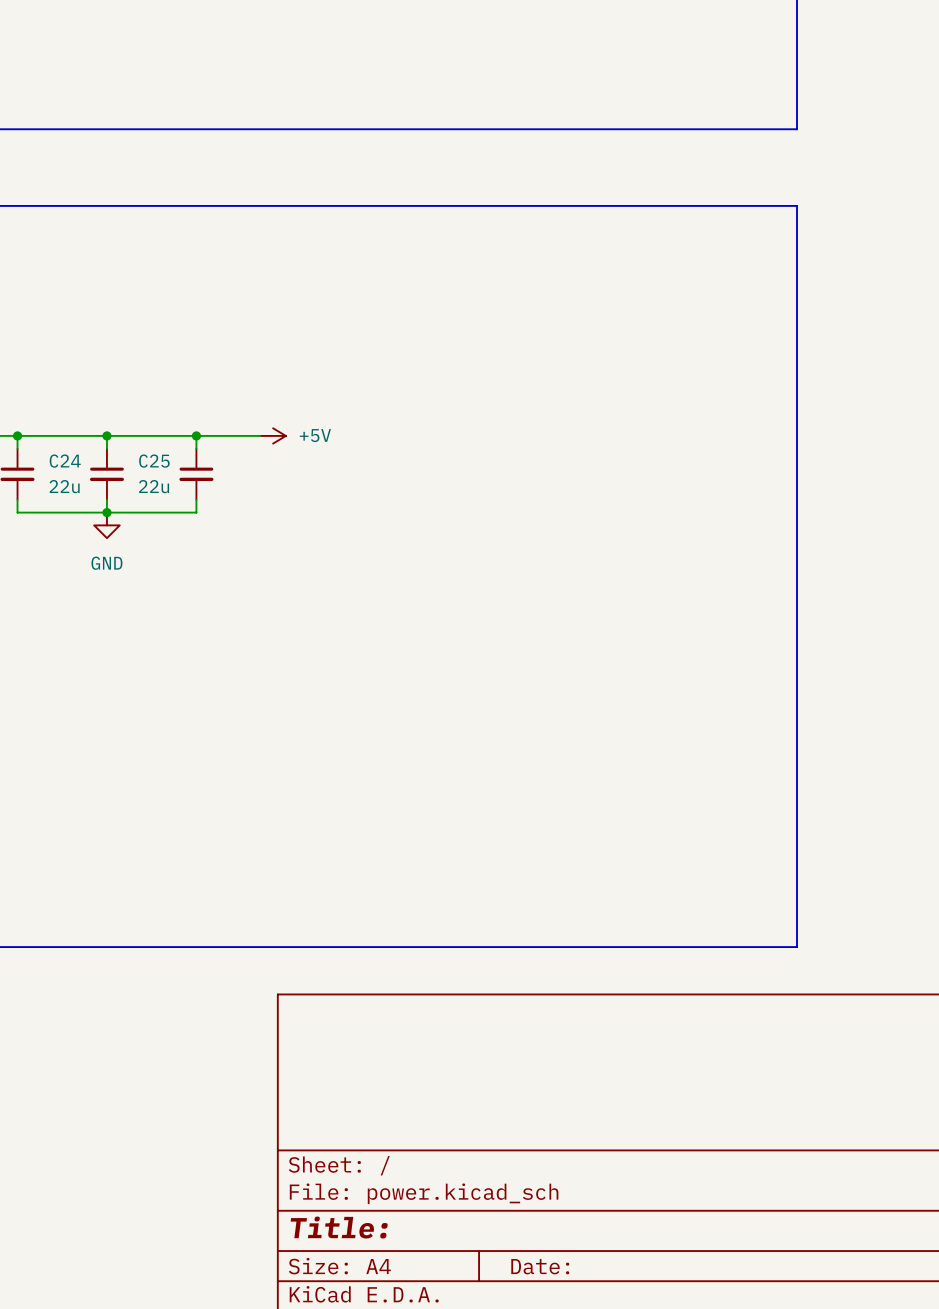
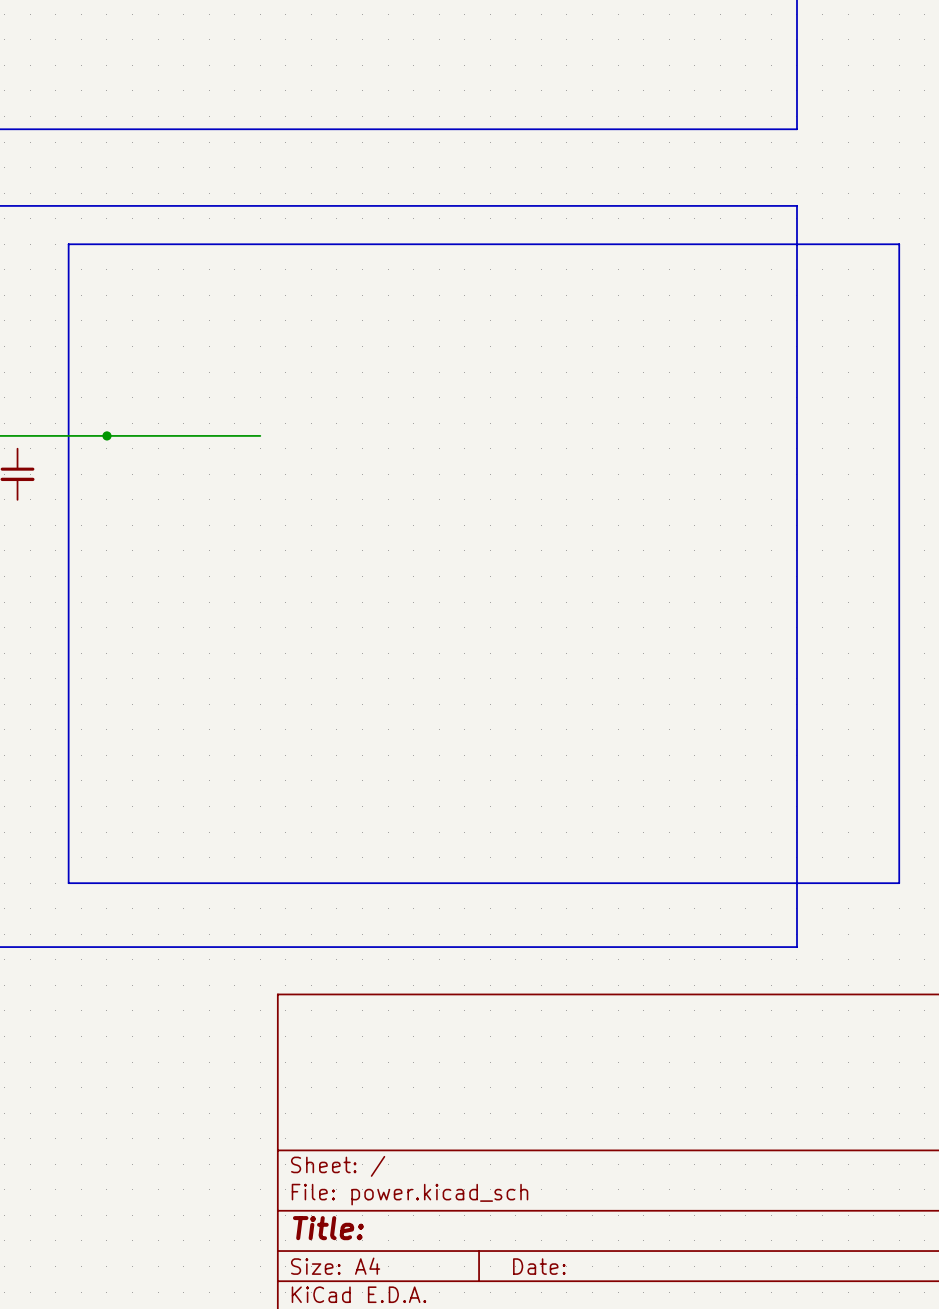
line: none -> (68, 244) (899, 244) (899, 883) (68, 883) (68, 244)
wire: (17, 435) (17, 448) -> none
junction: (17, 435) -> none
wire: (106, 435) (106, 448) -> none
wire: (196, 435) (196, 448) -> none
junction: (196, 435) -> none
power symbol: +5V (273, 435) -> none
C24: 22u (106, 474) -> none
C25: 22u (196, 474) -> none
wire: (17, 499) (17, 512) (196, 512) (196, 499) -> none
wire: (106, 499) (106, 512) -> none
junction: (106, 512) -> none
power symbol: GND (106, 525) -> none

